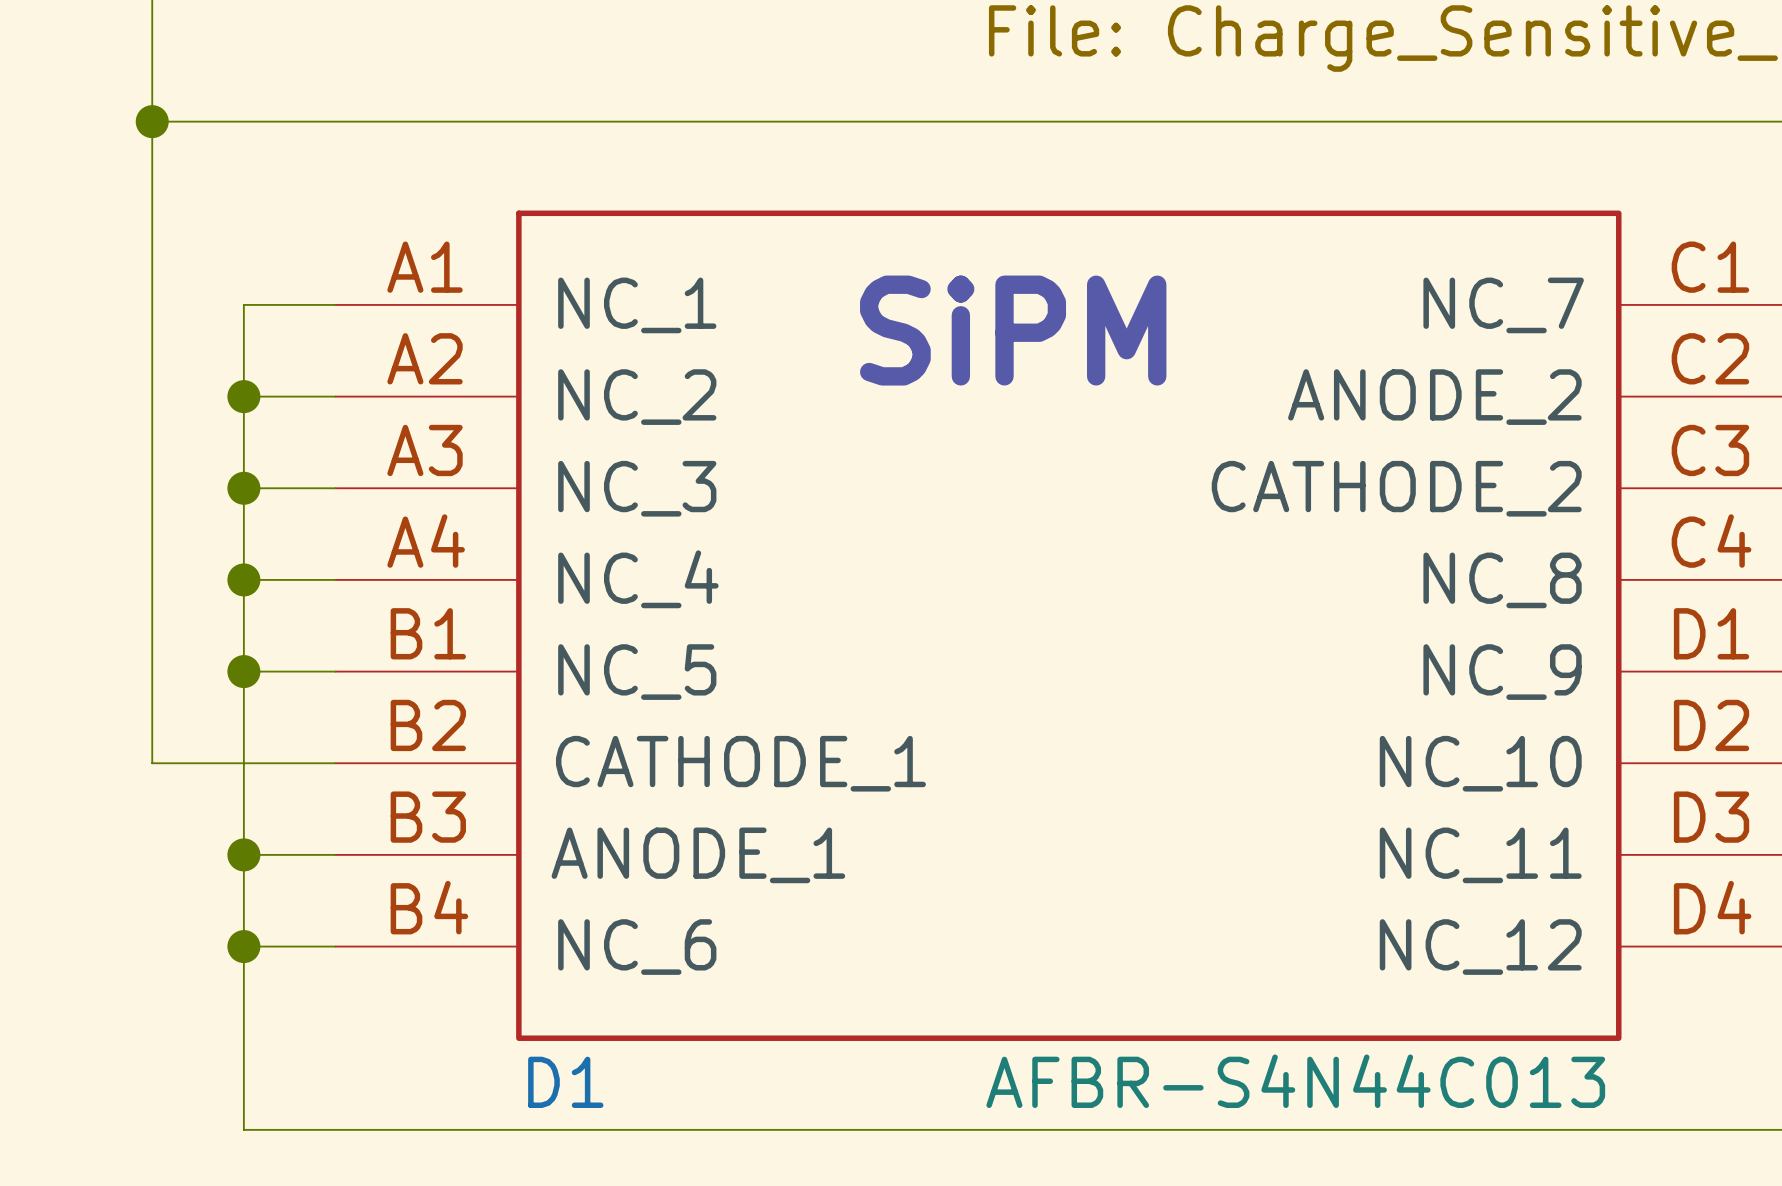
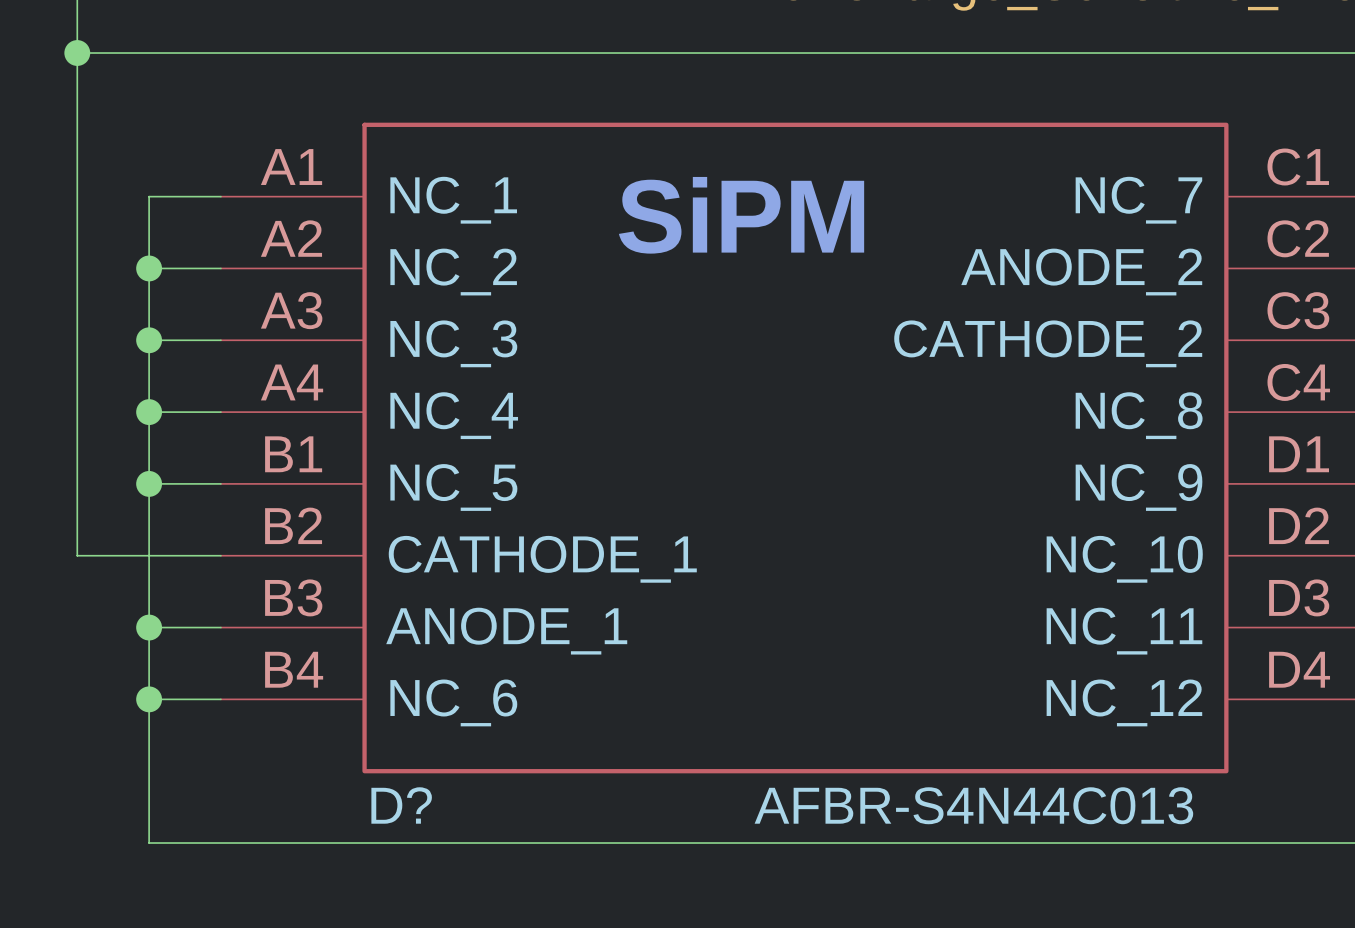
D1 name: D1 (565, 1082) -> D? (401, 805)

